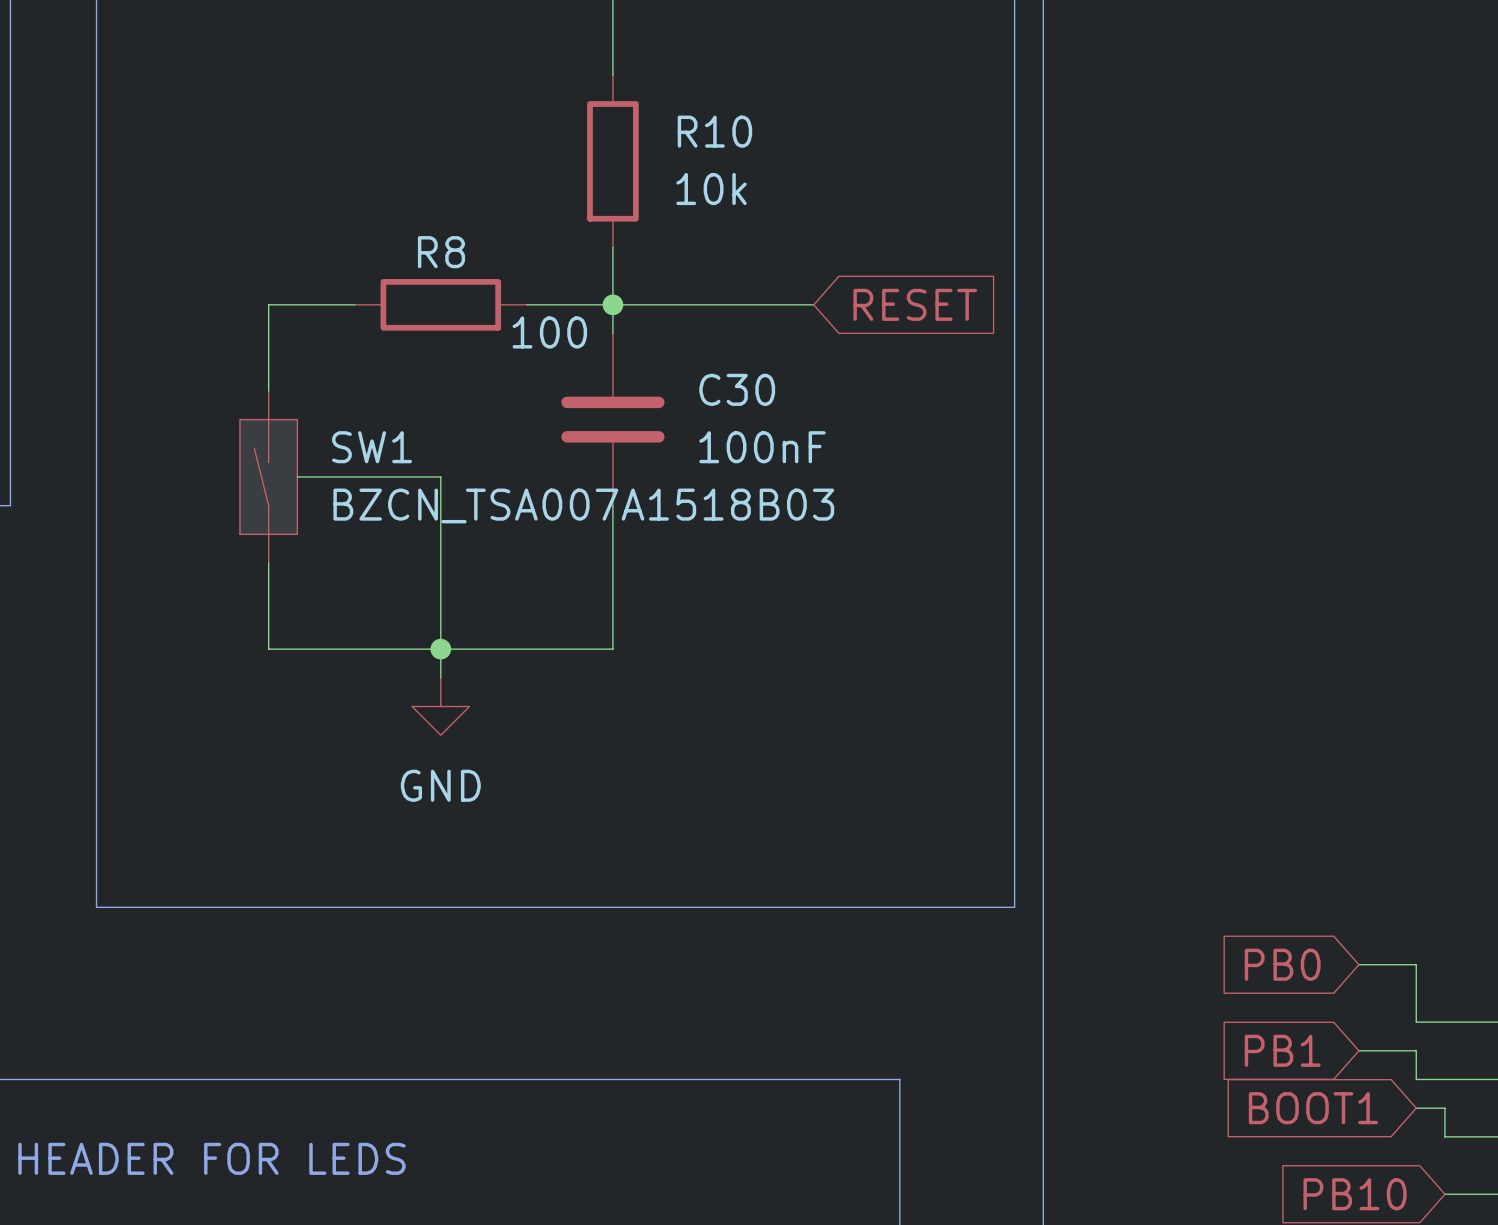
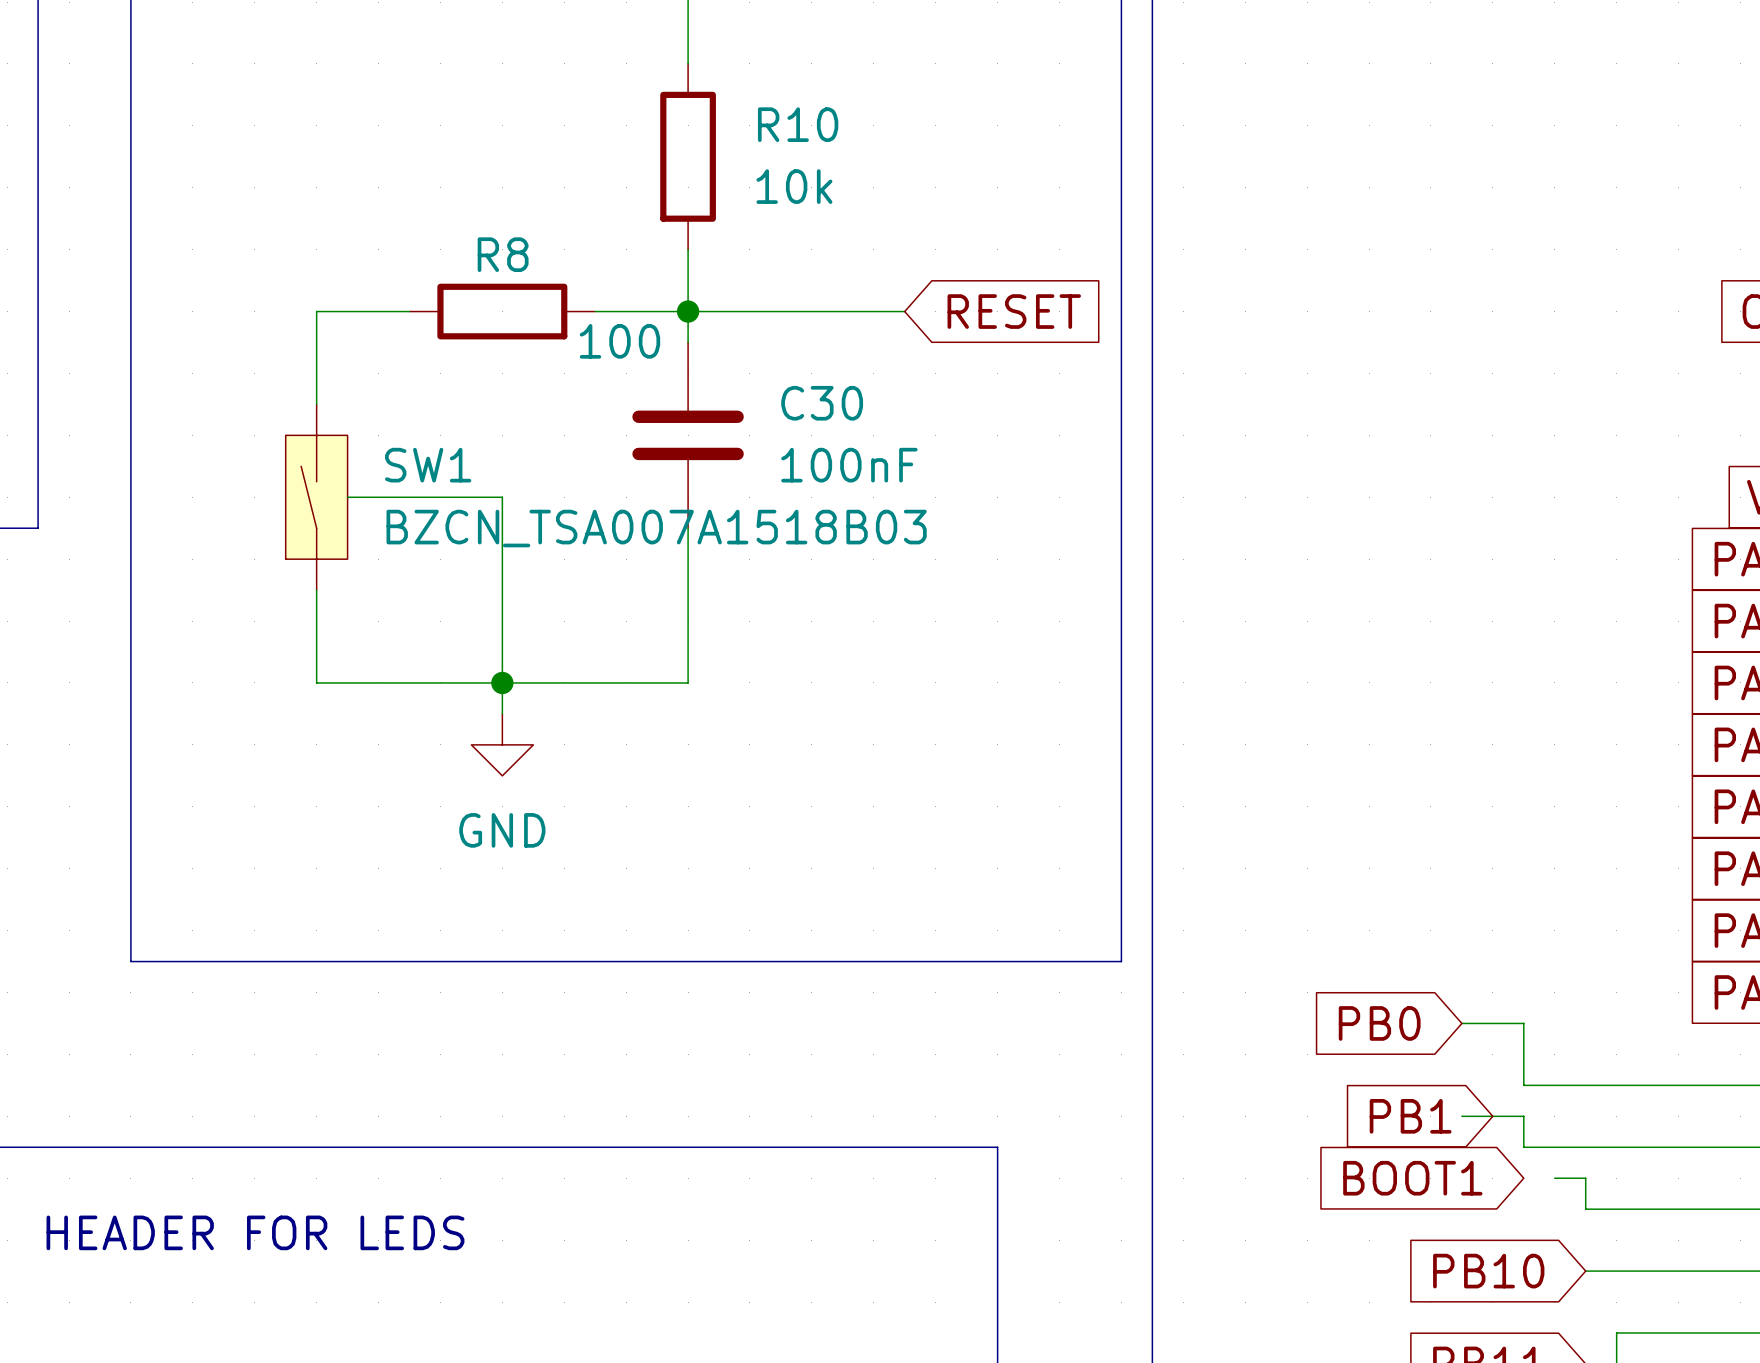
global label position: PB0 (1282, 964) -> PB0 (1379, 1023)
wire: none -> (1461, 1023) (1492, 1023)
wire: (1387, 964) (1416, 964) (1416, 1022) -> (1523, 1023) (1523, 1085) (1554, 1085)
wire: none -> (1461, 1116) (1492, 1116)
wire: (1387, 1050) (1416, 1050) (1416, 1079) -> (1523, 1116) (1523, 1147) (1554, 1147)
global label position: BOOT1 (1313, 1108) -> BOOT1 (1412, 1178)

